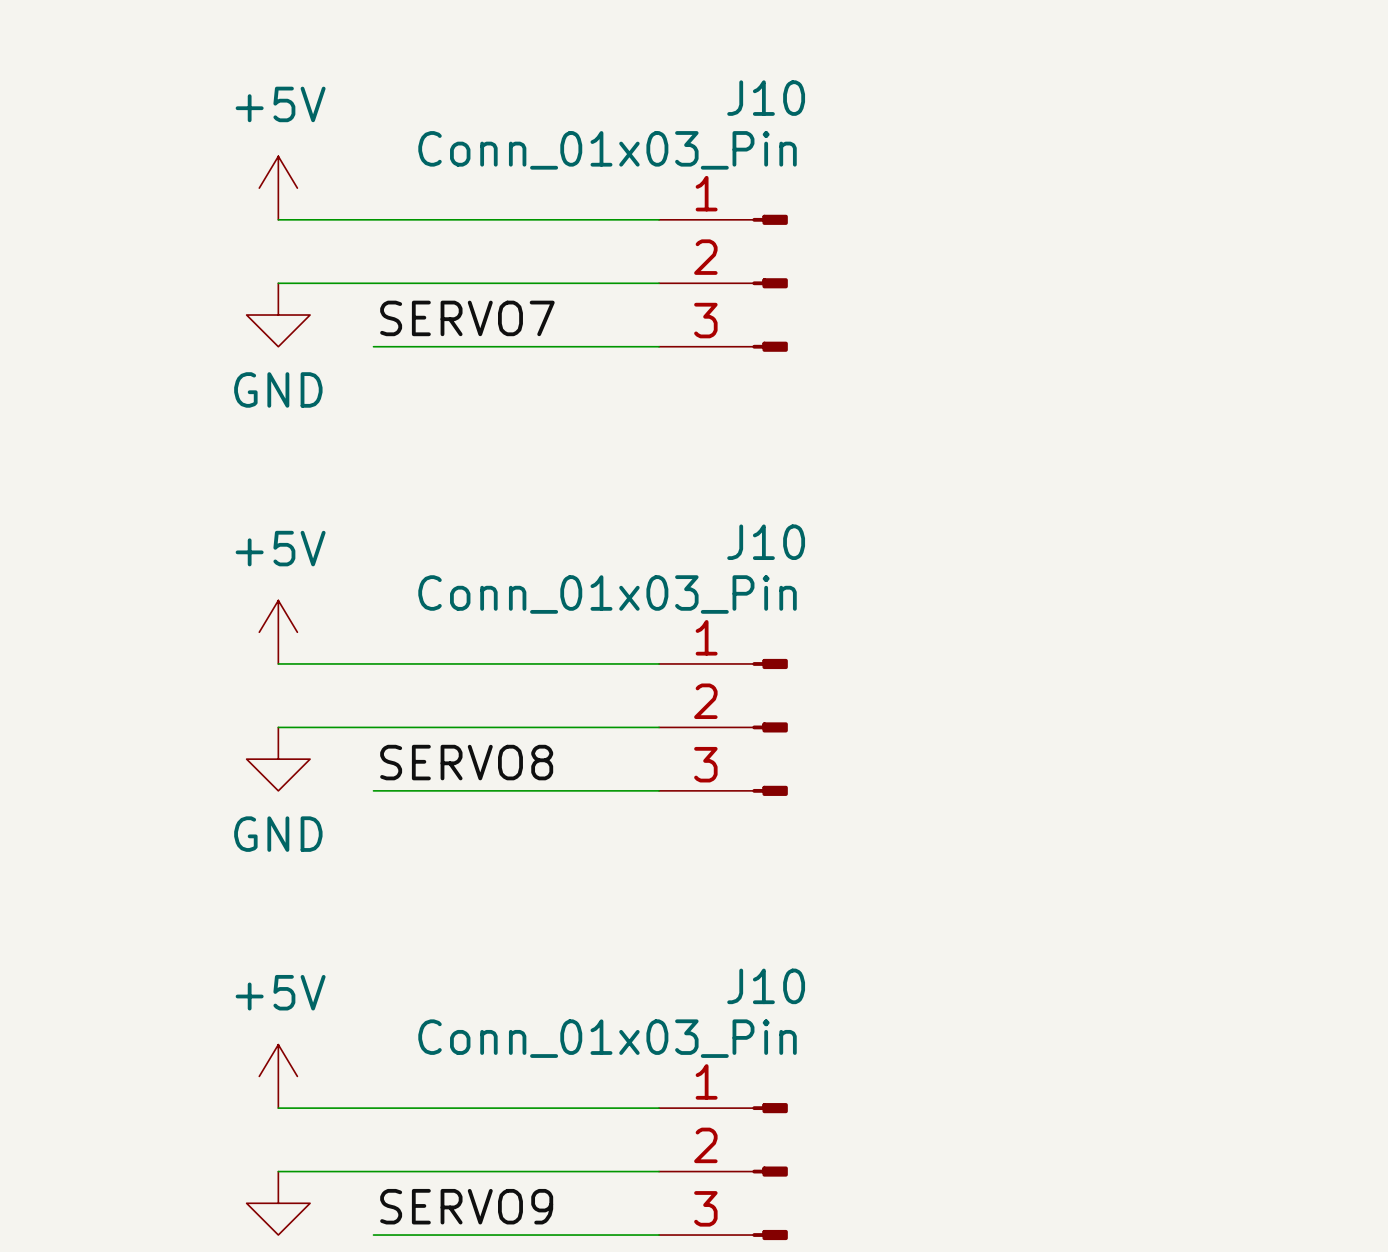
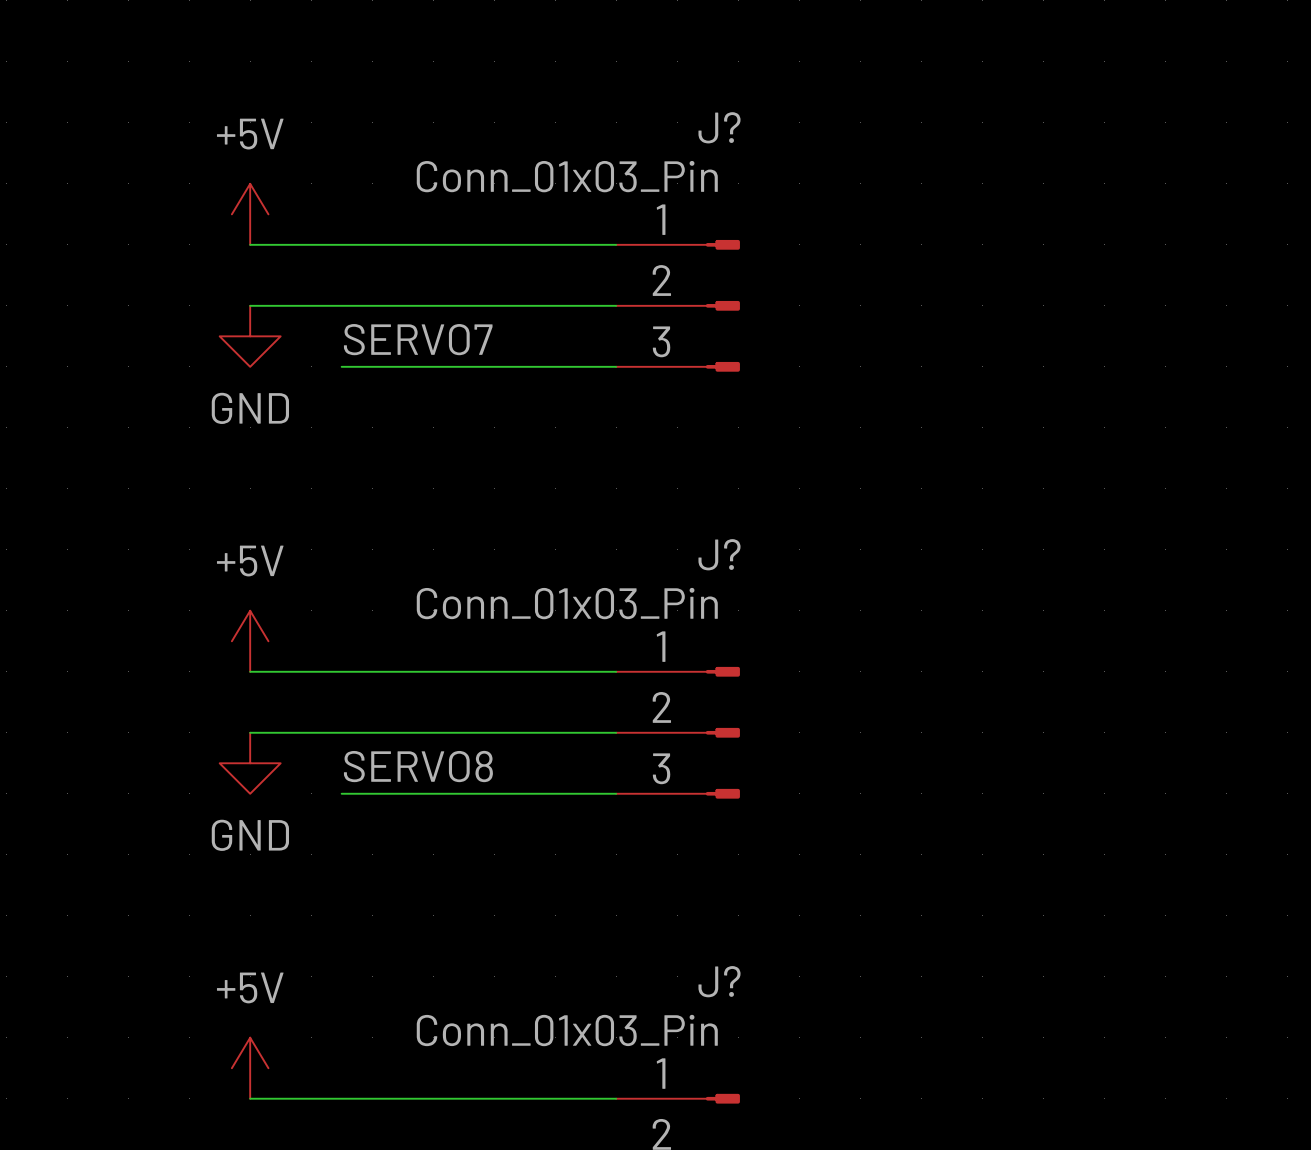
J10 name: J10 (766, 98) -> J? (719, 127)
J10 name: J10 (766, 542) -> J? (719, 554)
J10 name: J10 (766, 986) -> J? (719, 981)

